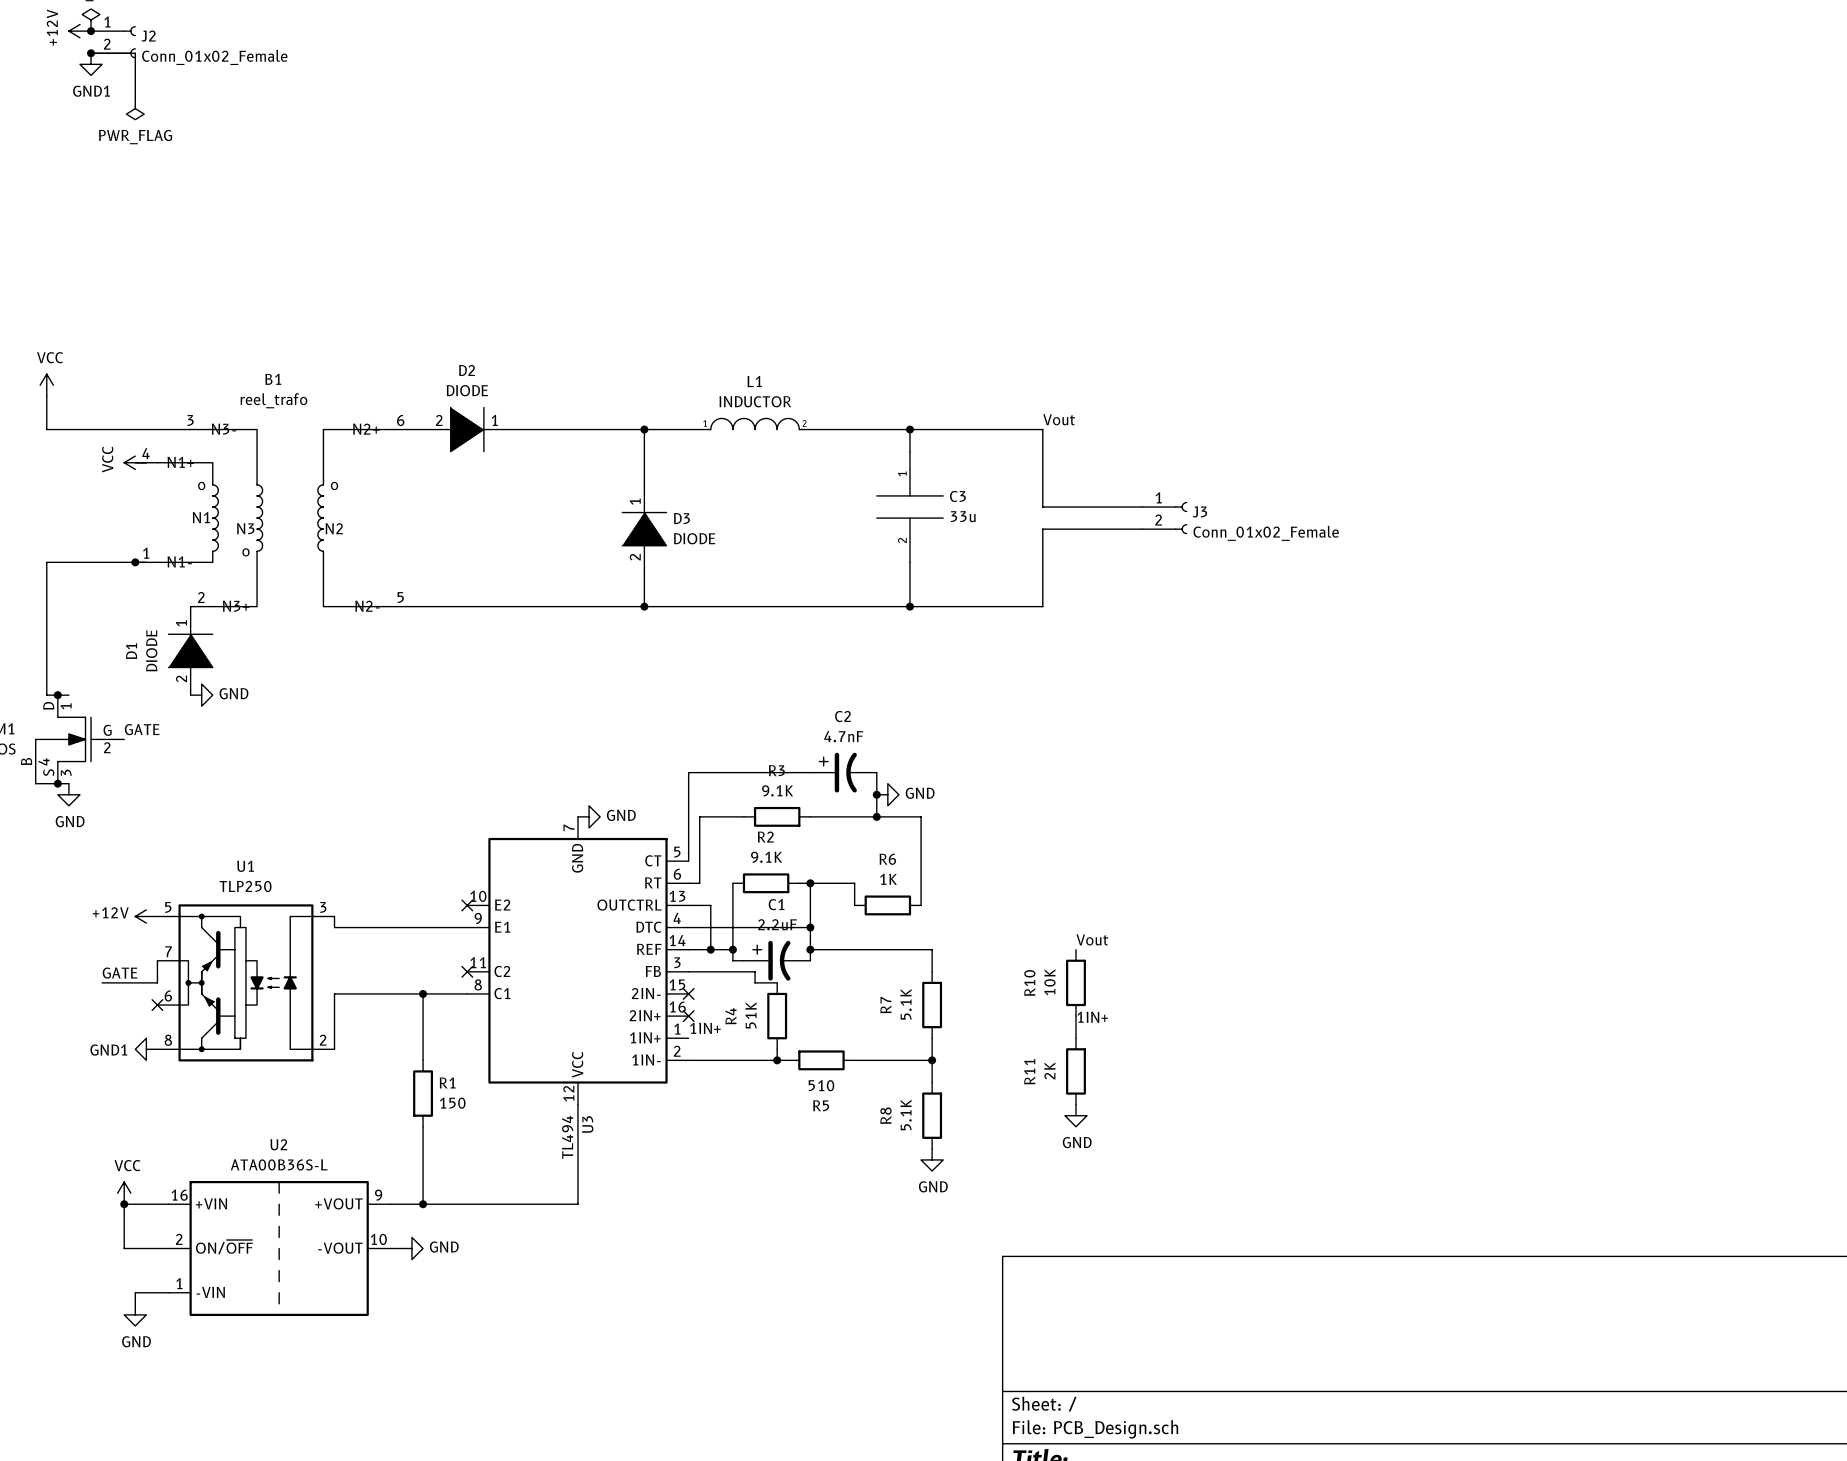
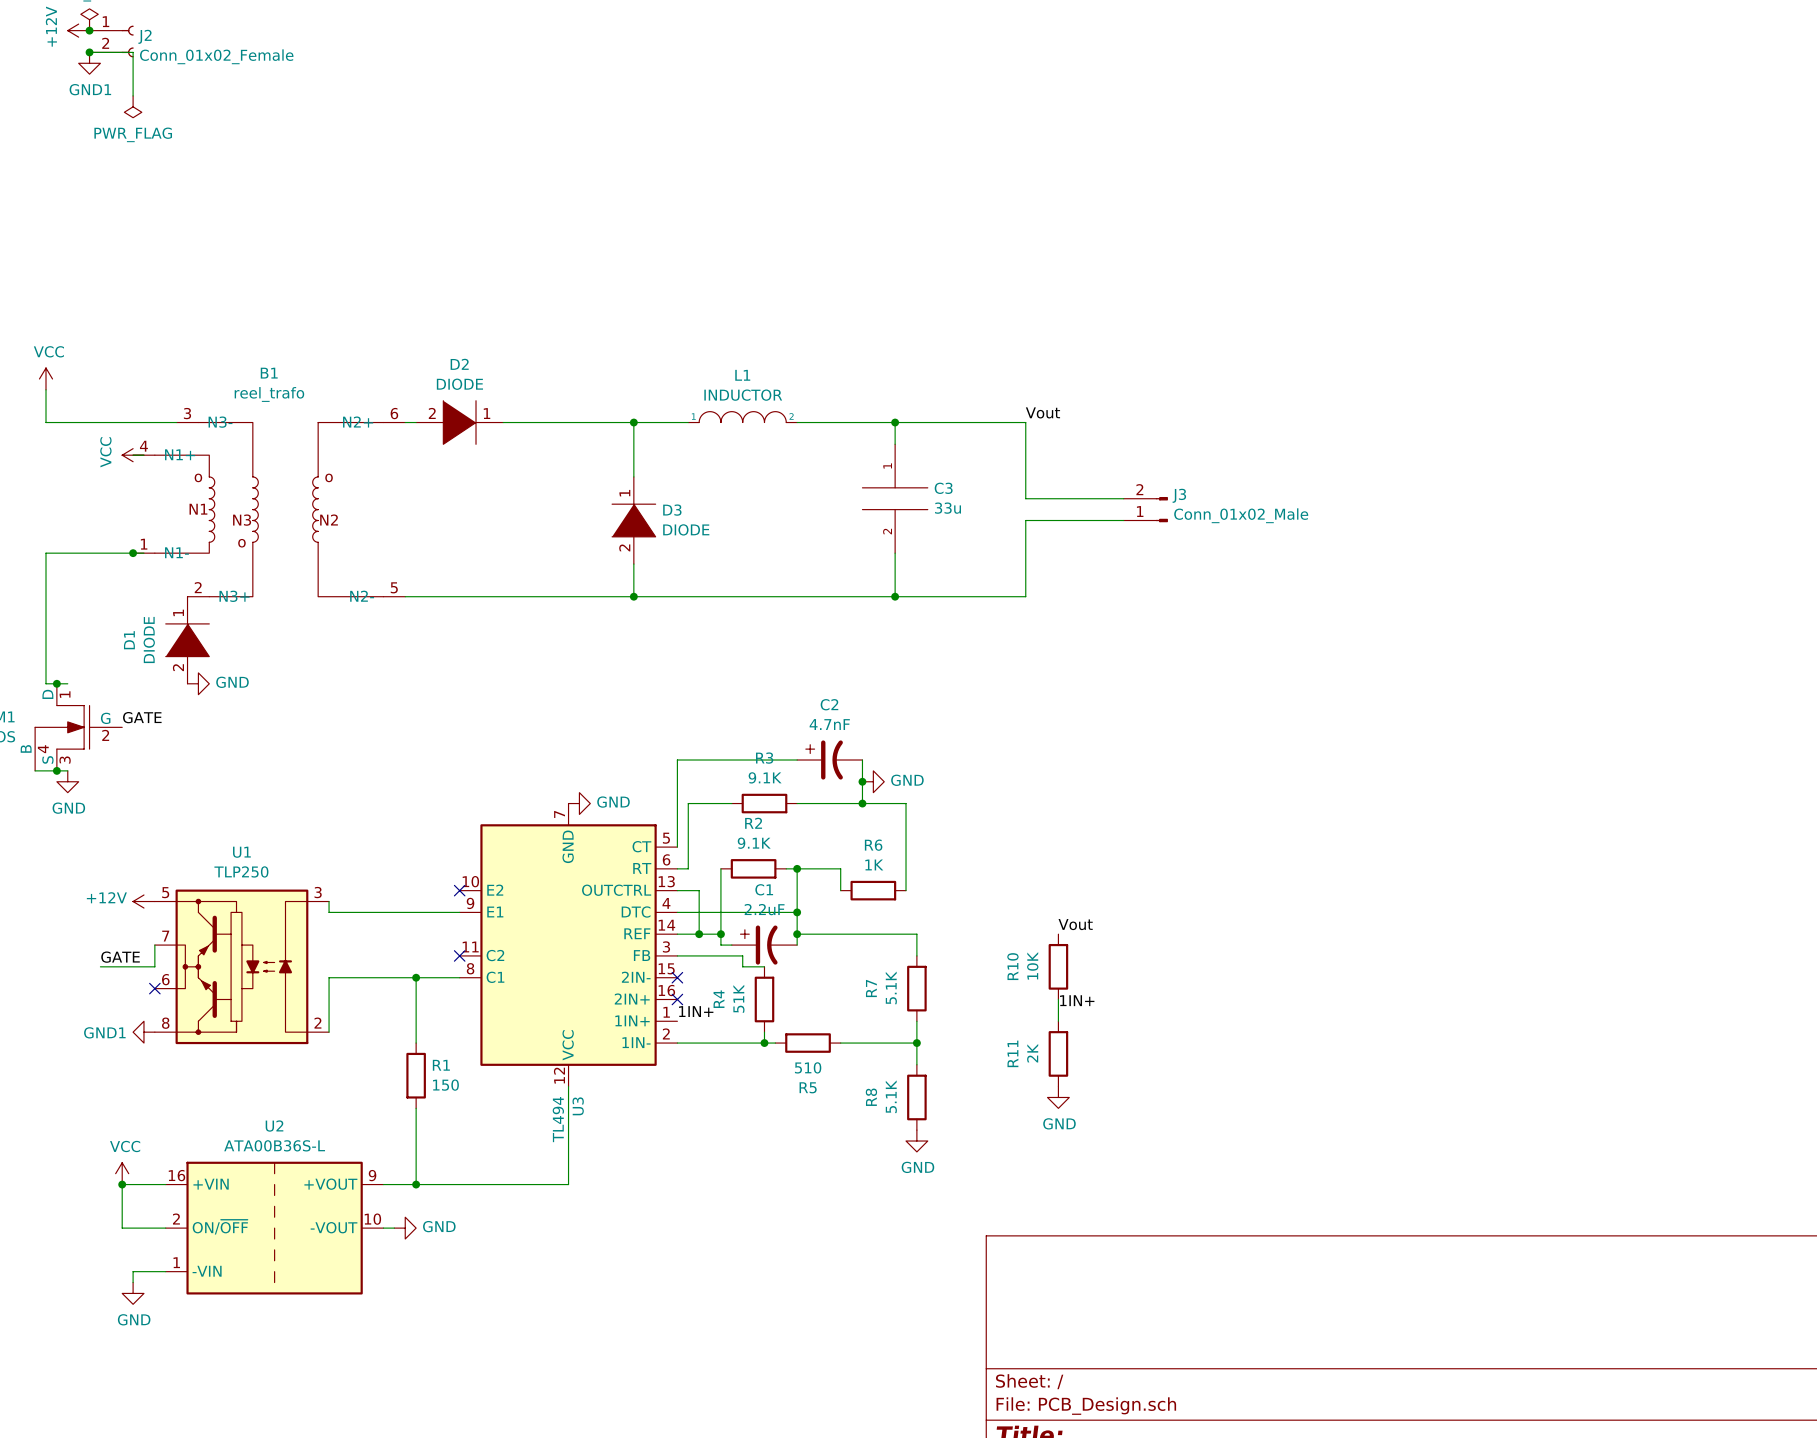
J3 symbol: [1142, 501, 1188, 535] -> [1123, 496, 1168, 523]
J3 value: Conn_01x02_Female (1266, 533) -> Conn_01x02_Male (1241, 515)

